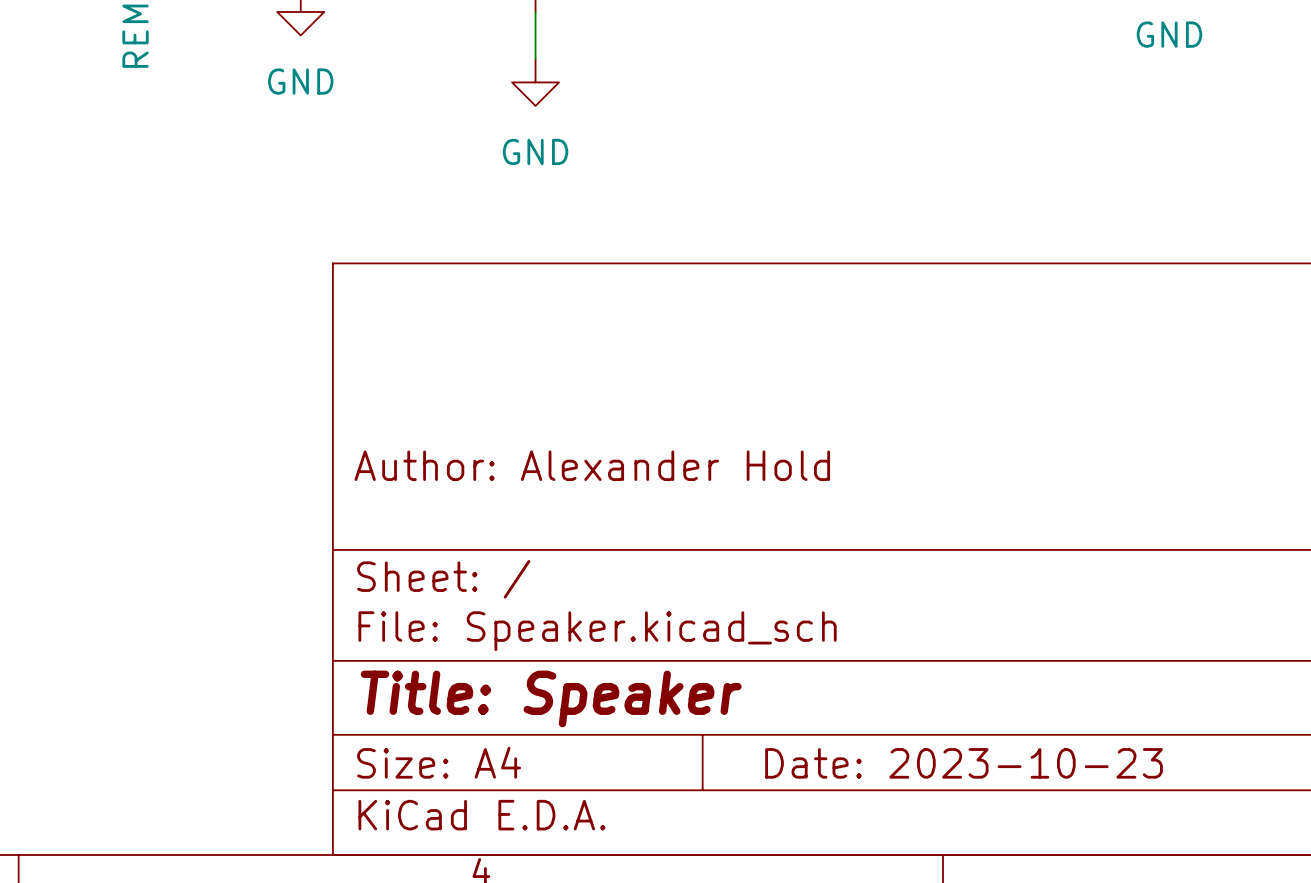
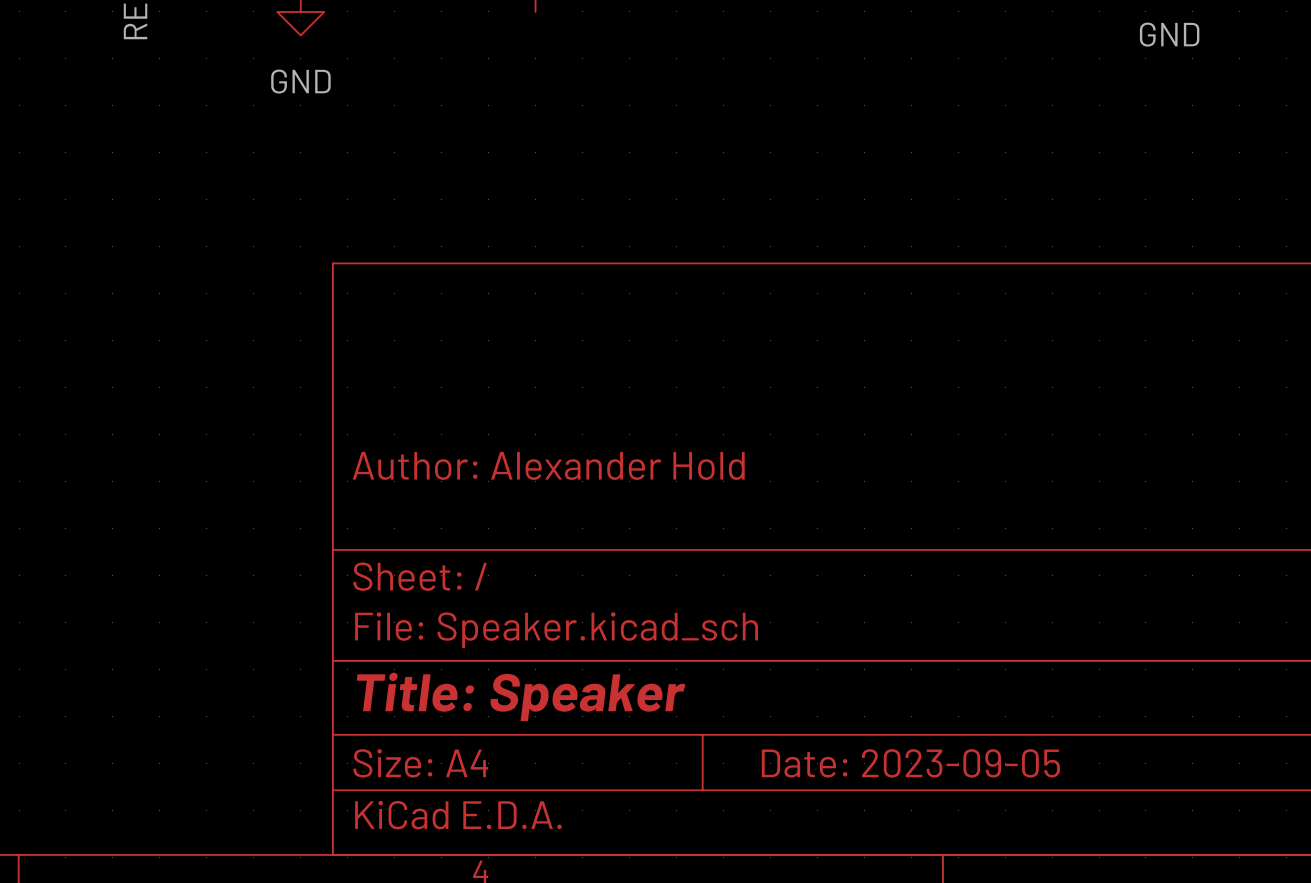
wire: (535, 11) (535, 58) -> none
power symbol: GND (535, 82) -> none
title block: Date: 2023-10-23 (964, 763) -> Date: 2023-09-05 (910, 763)

